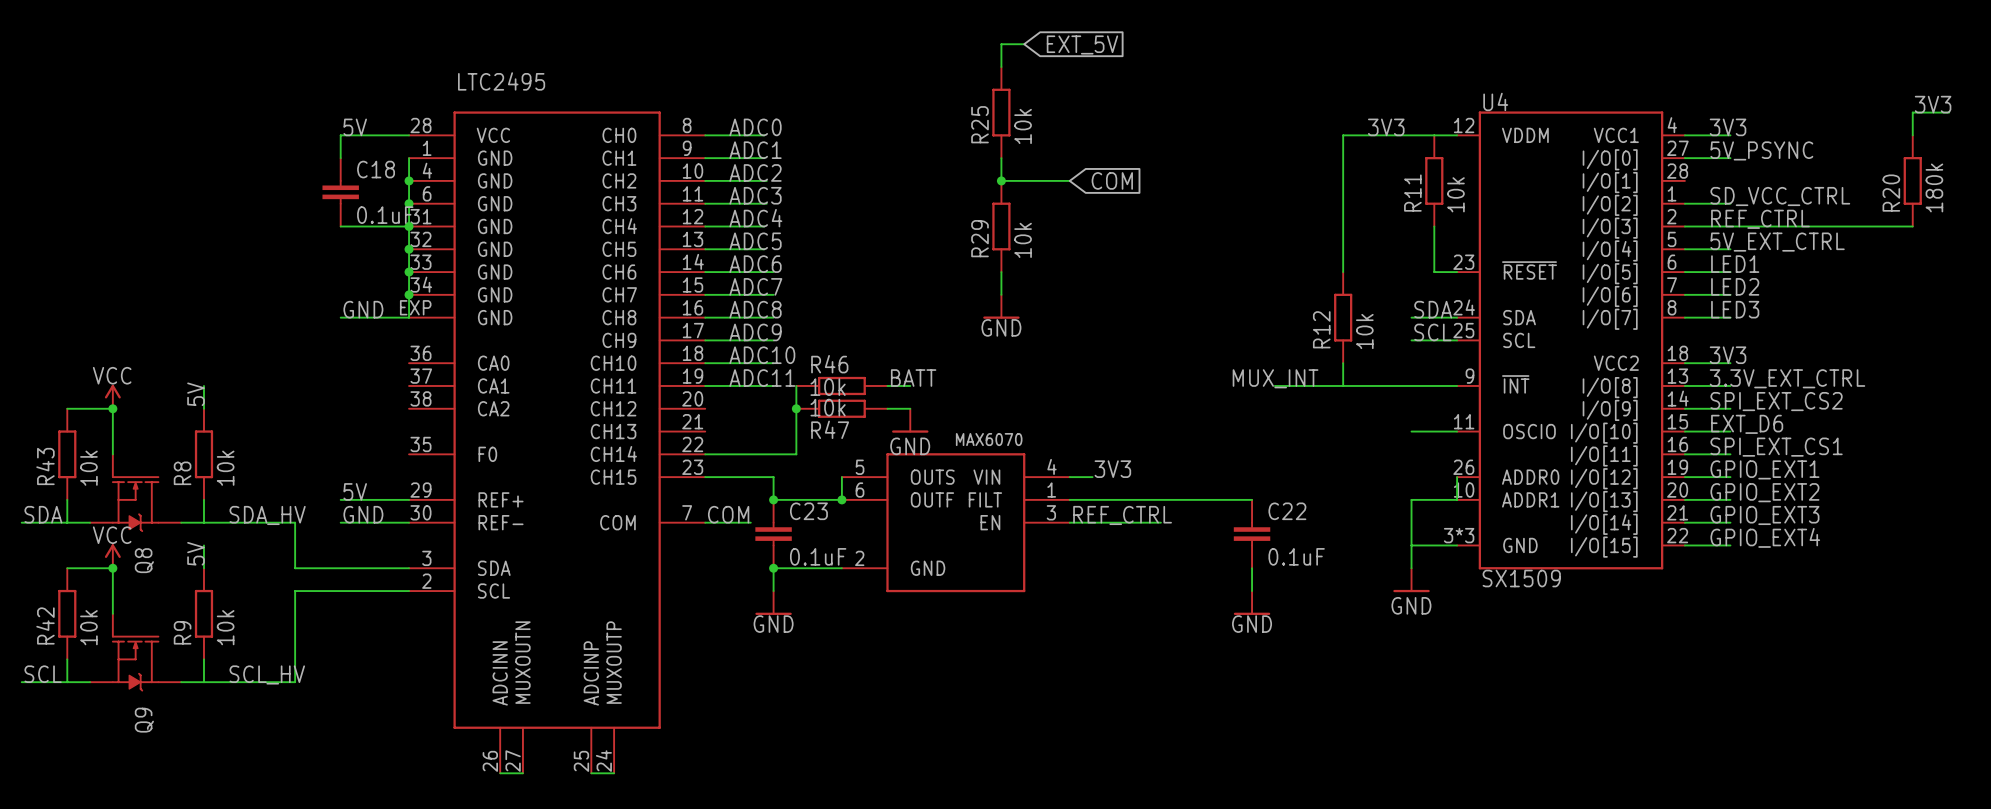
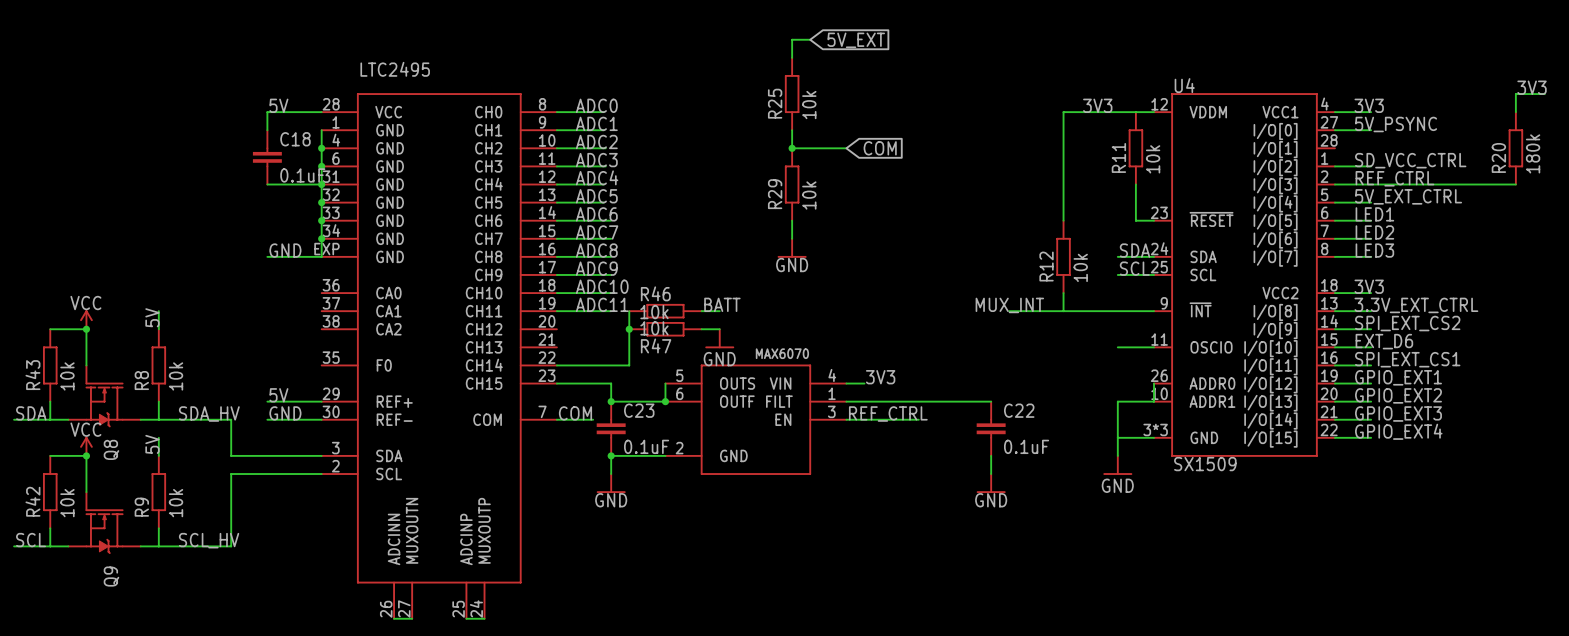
global label: EXT_5V (1082, 44) -> 5V_EXT (856, 40)

